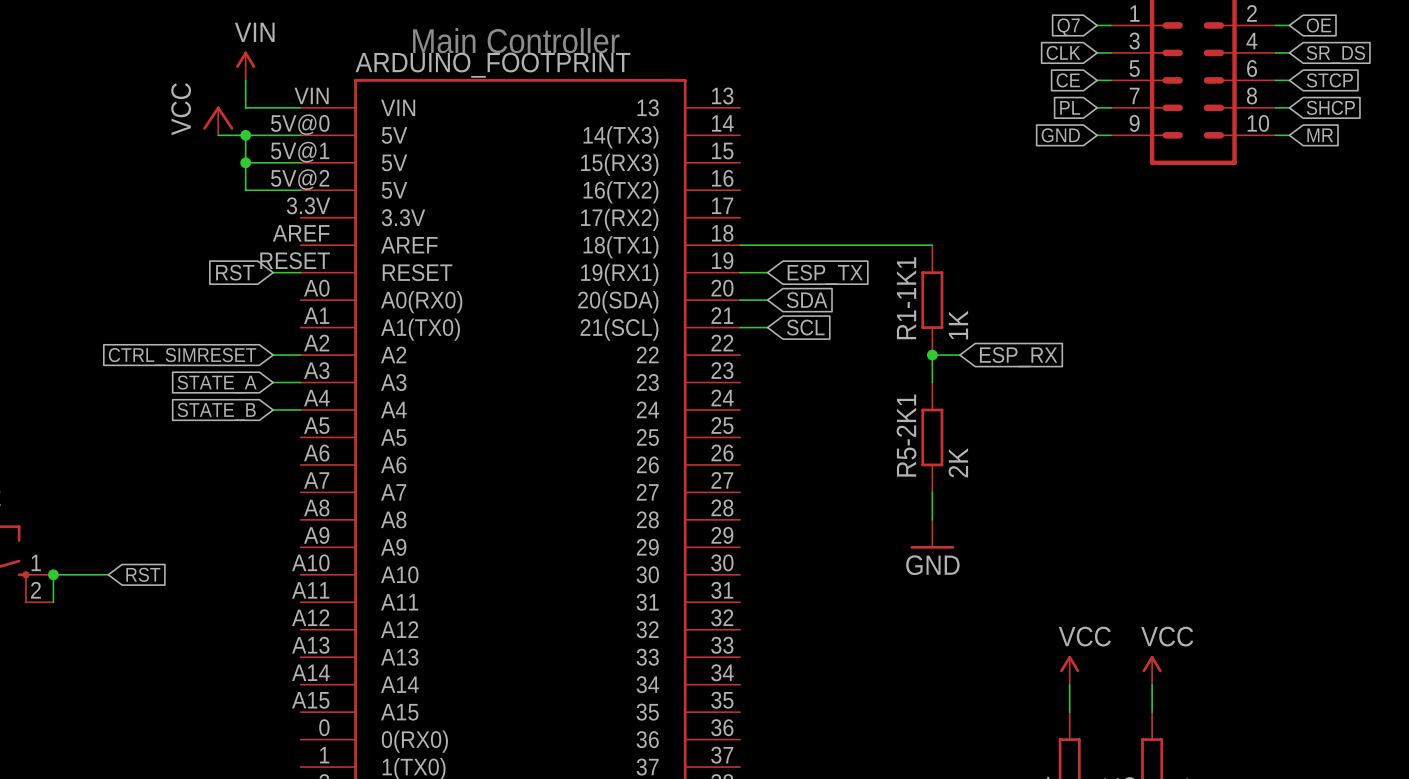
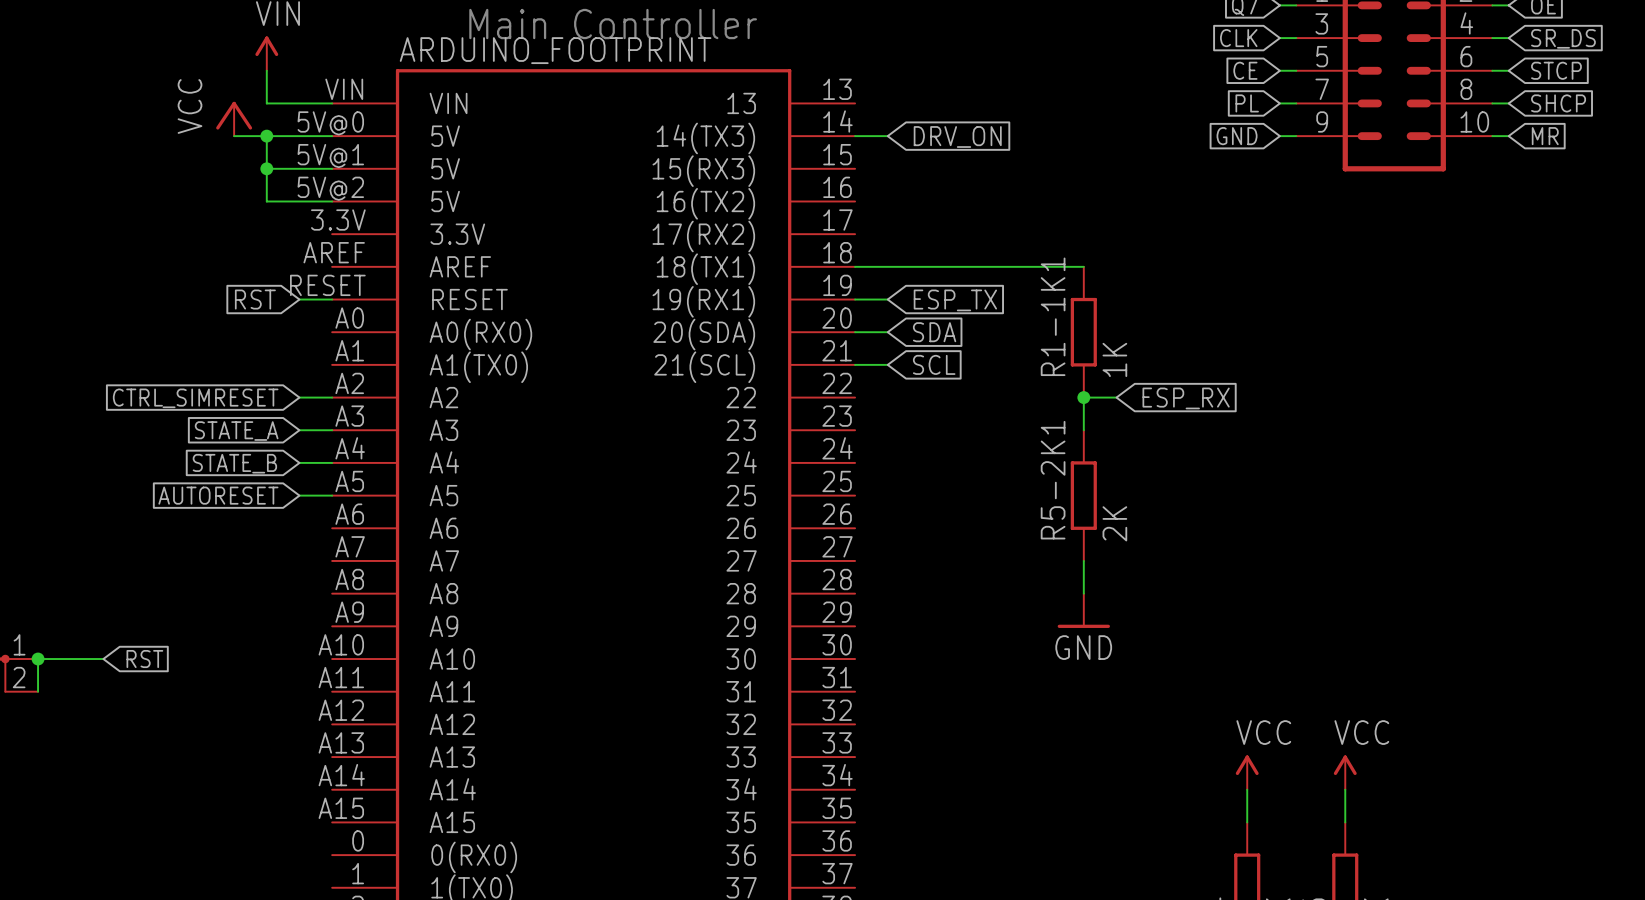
wire: none -> (855, 136) (887, 136)
global label: none -> DRV_ON (957, 136)
global label: none -> AUTORESET (218, 495)
wire: none -> (299, 495) (332, 495)

